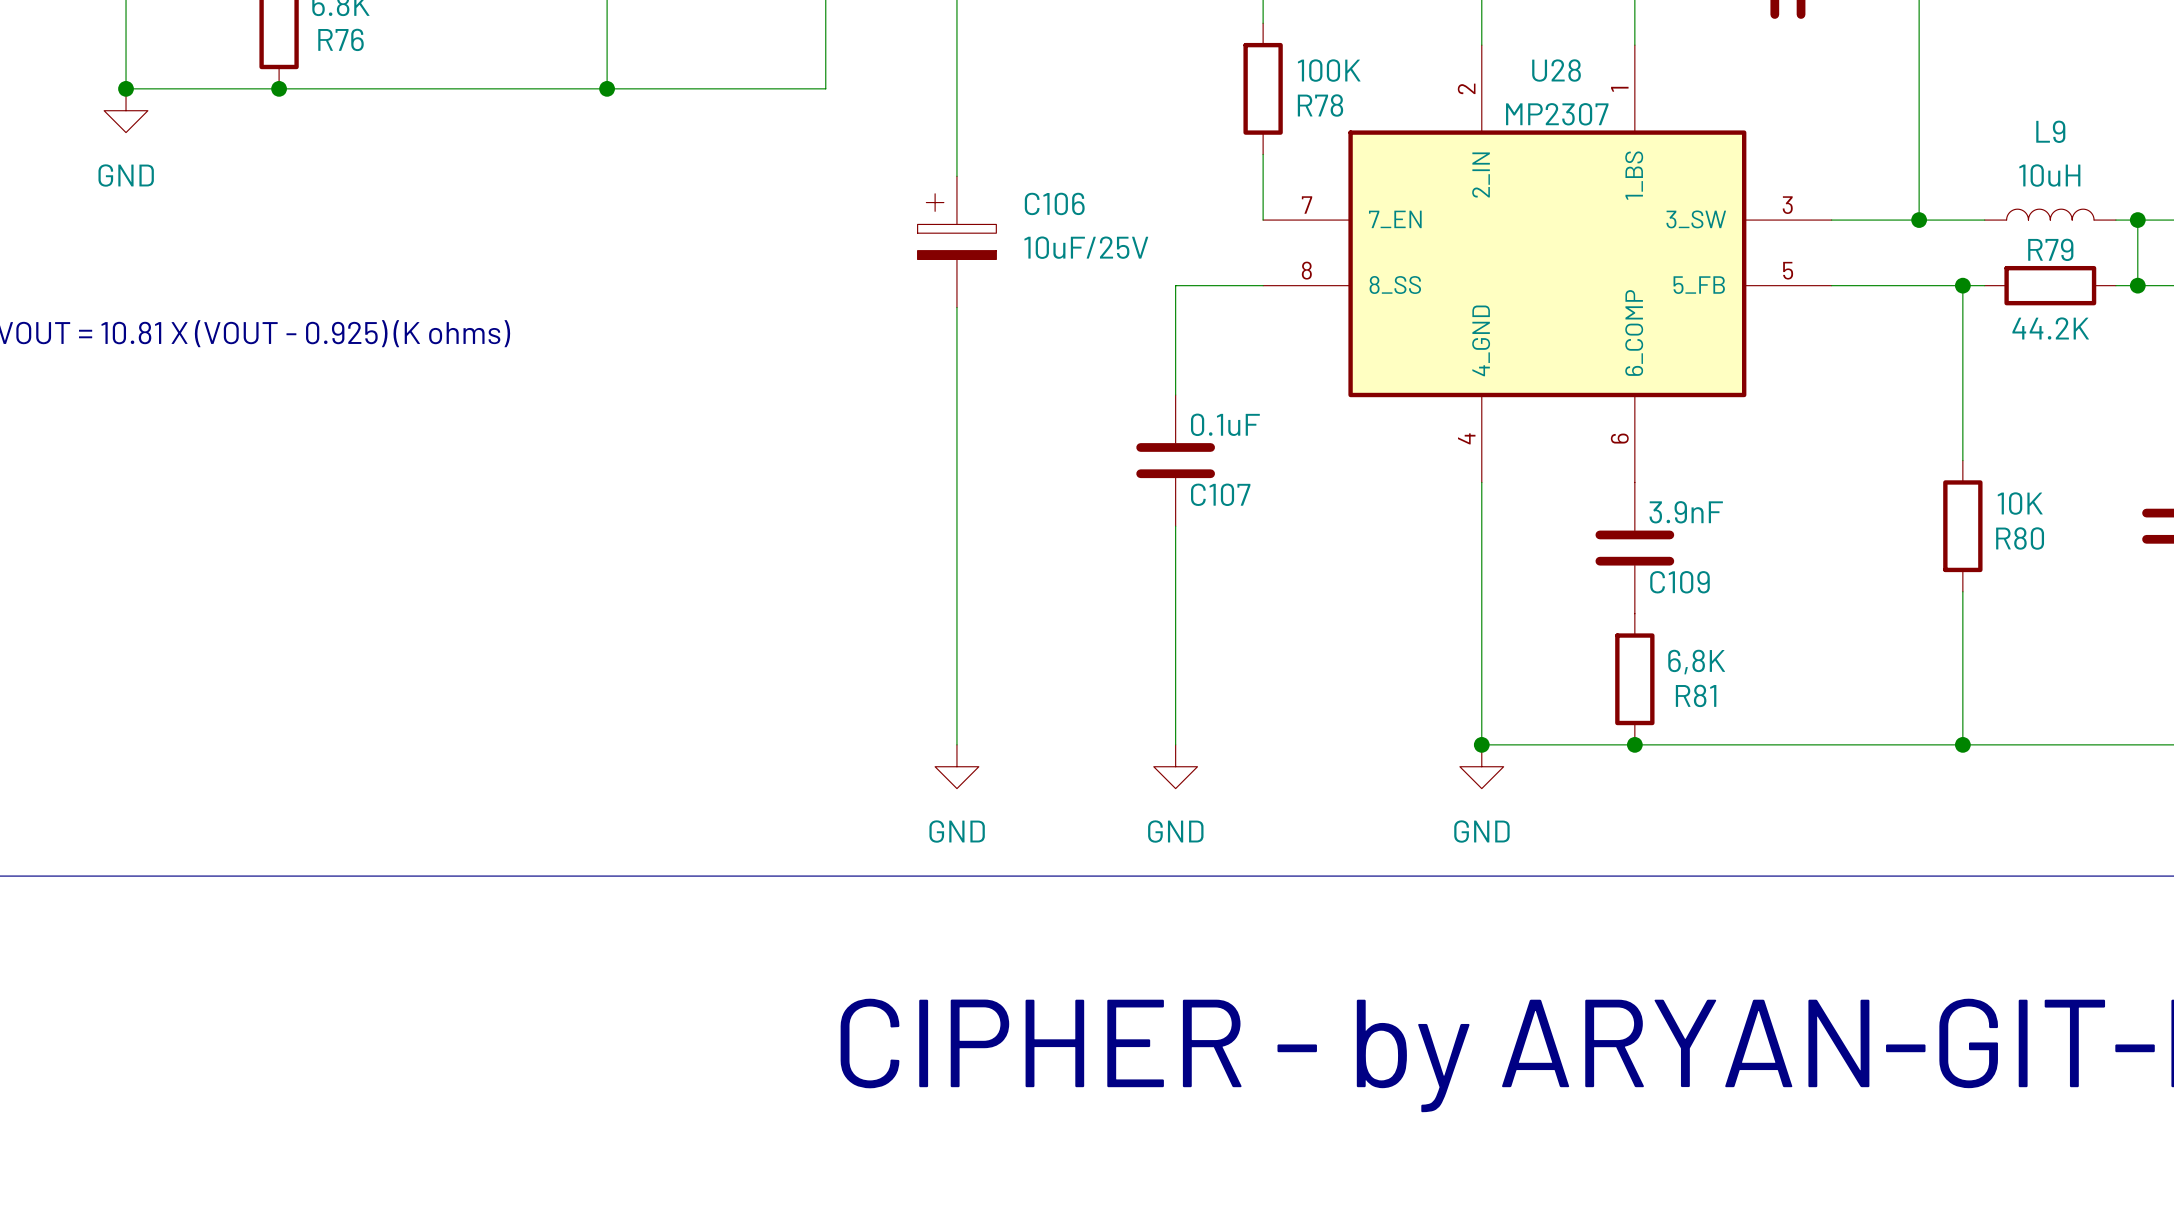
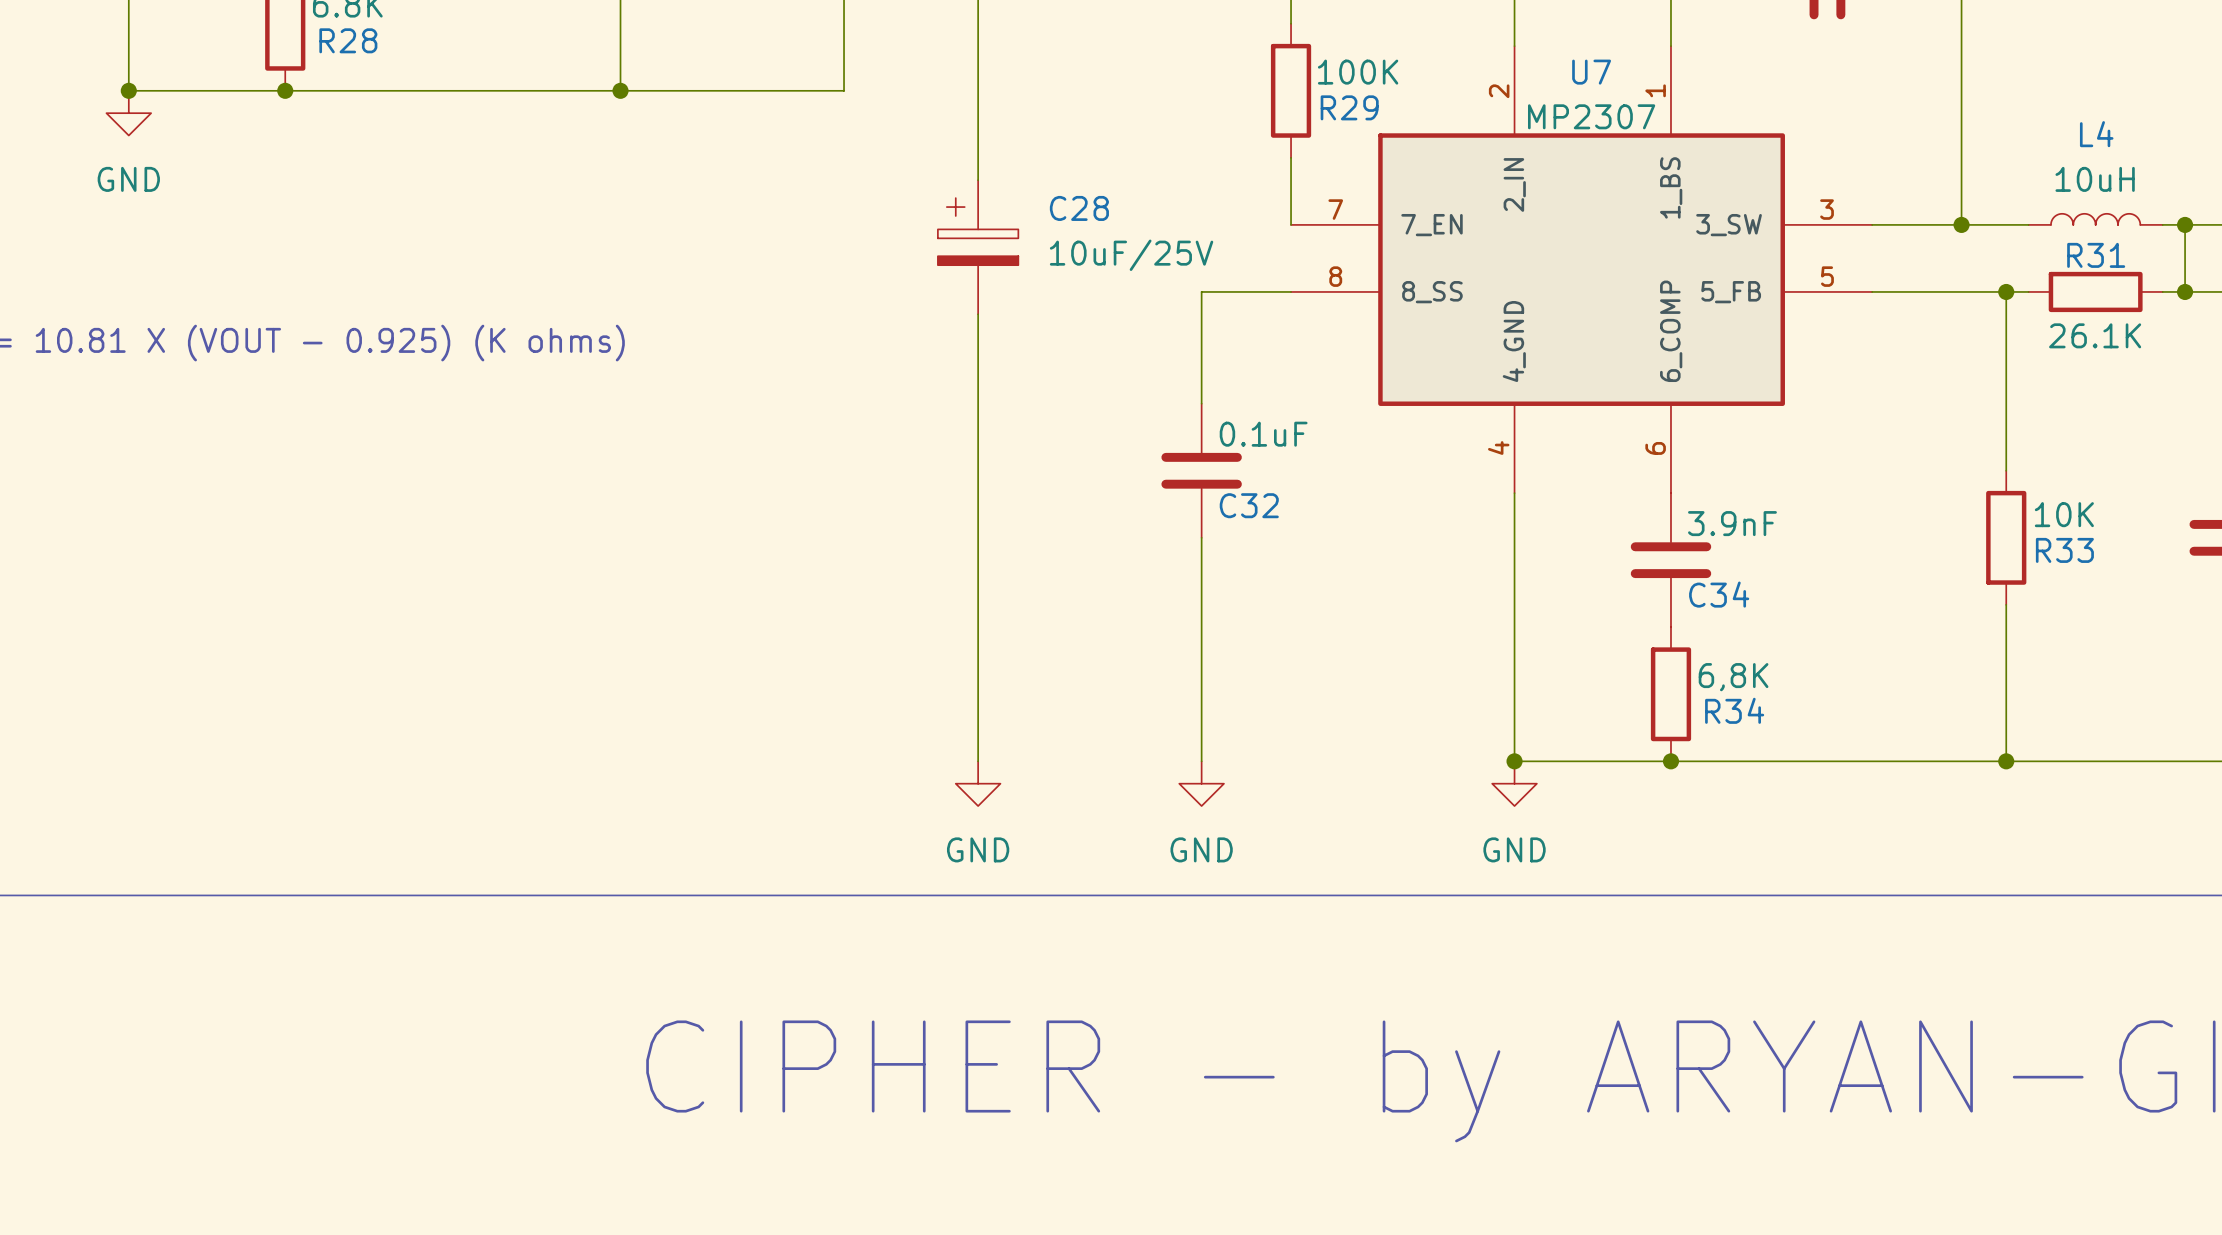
R76 name: R76 (341, 39) -> R28 (348, 40)
U28 name: U28 (1556, 70) -> U7 (1591, 72)
R78 name: R78 (1320, 105) -> R29 (1349, 107)
L9 name: L9 (2050, 131) -> L4 (2096, 134)
C106 name: C106 (1054, 203) -> C28 (1079, 208)
R79 name: R79 (2050, 249) -> R31 (2096, 255)
R79 value: 44.2K (2050, 328) -> 26.1K (2095, 335)
C107 name: C107 (1220, 494) -> C32 (1249, 505)
R80 name: R80 (2020, 538) -> R33 (2064, 550)
C109 name: C109 (1679, 582) -> C34 (1719, 594)
R81 name: R81 (1696, 695) -> R34 (1734, 710)

